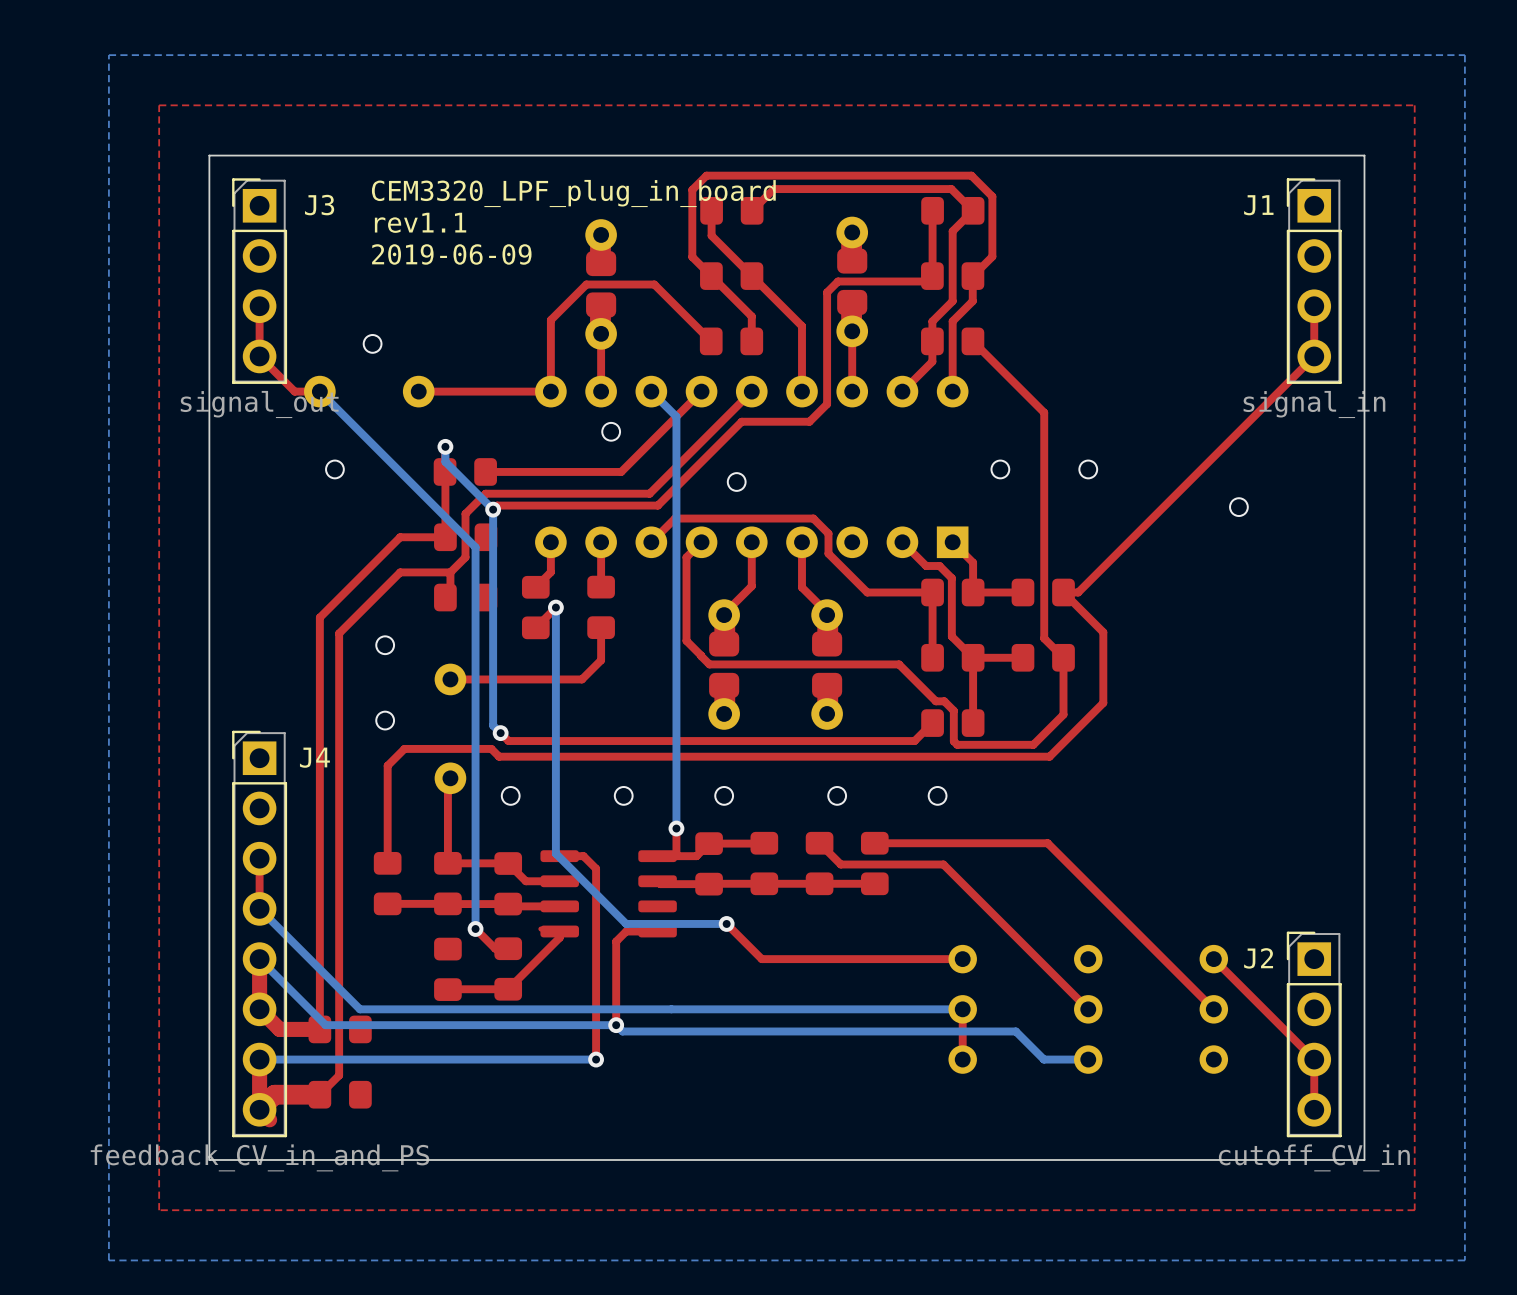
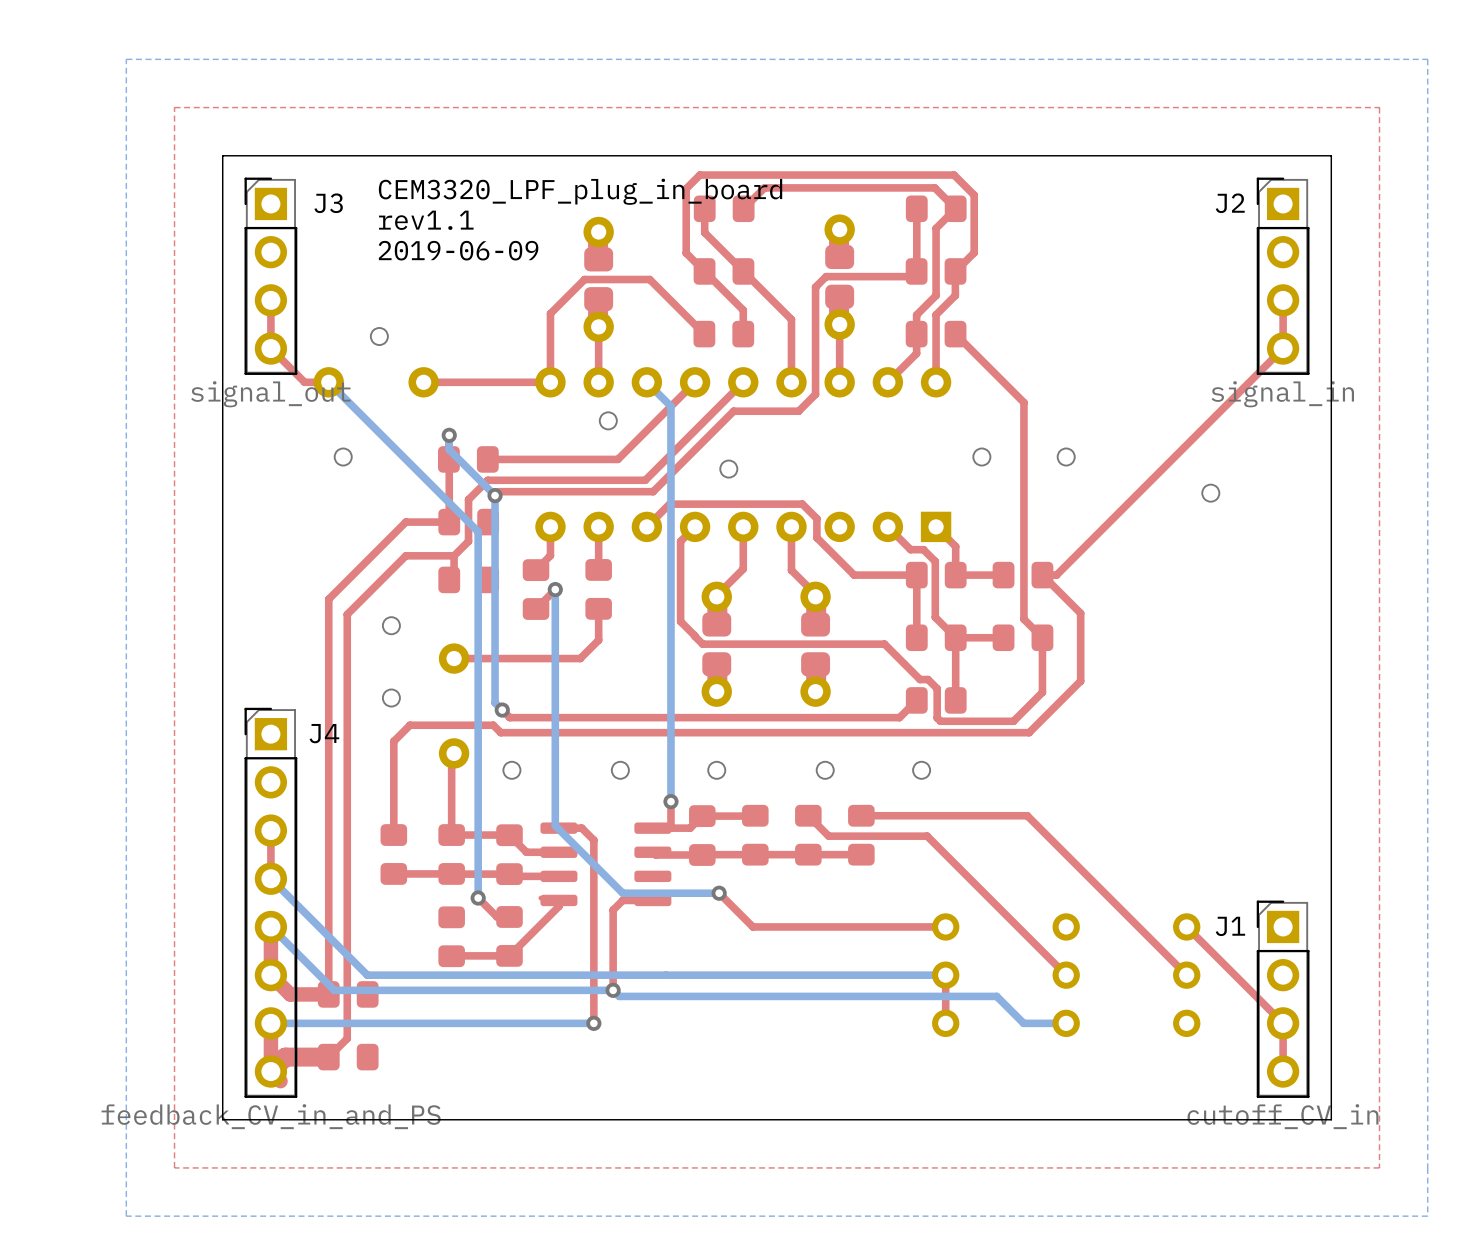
J1 name: J1 (1258, 205) -> J2 (1230, 203)
J2 name: J2 (1258, 958) -> J1 (1230, 926)

